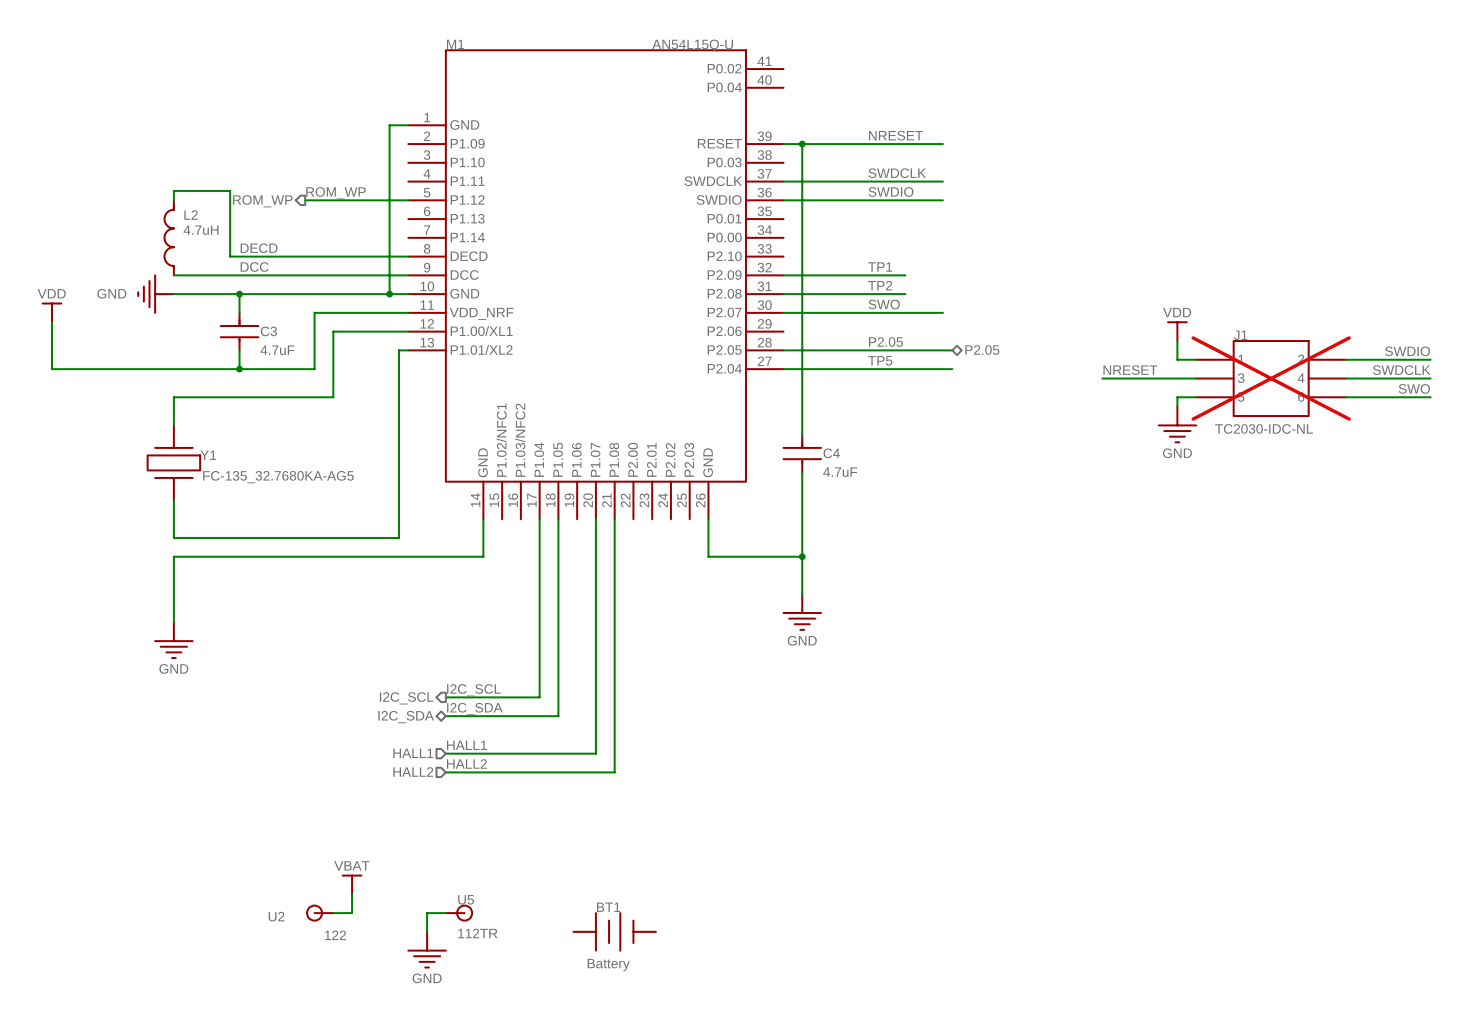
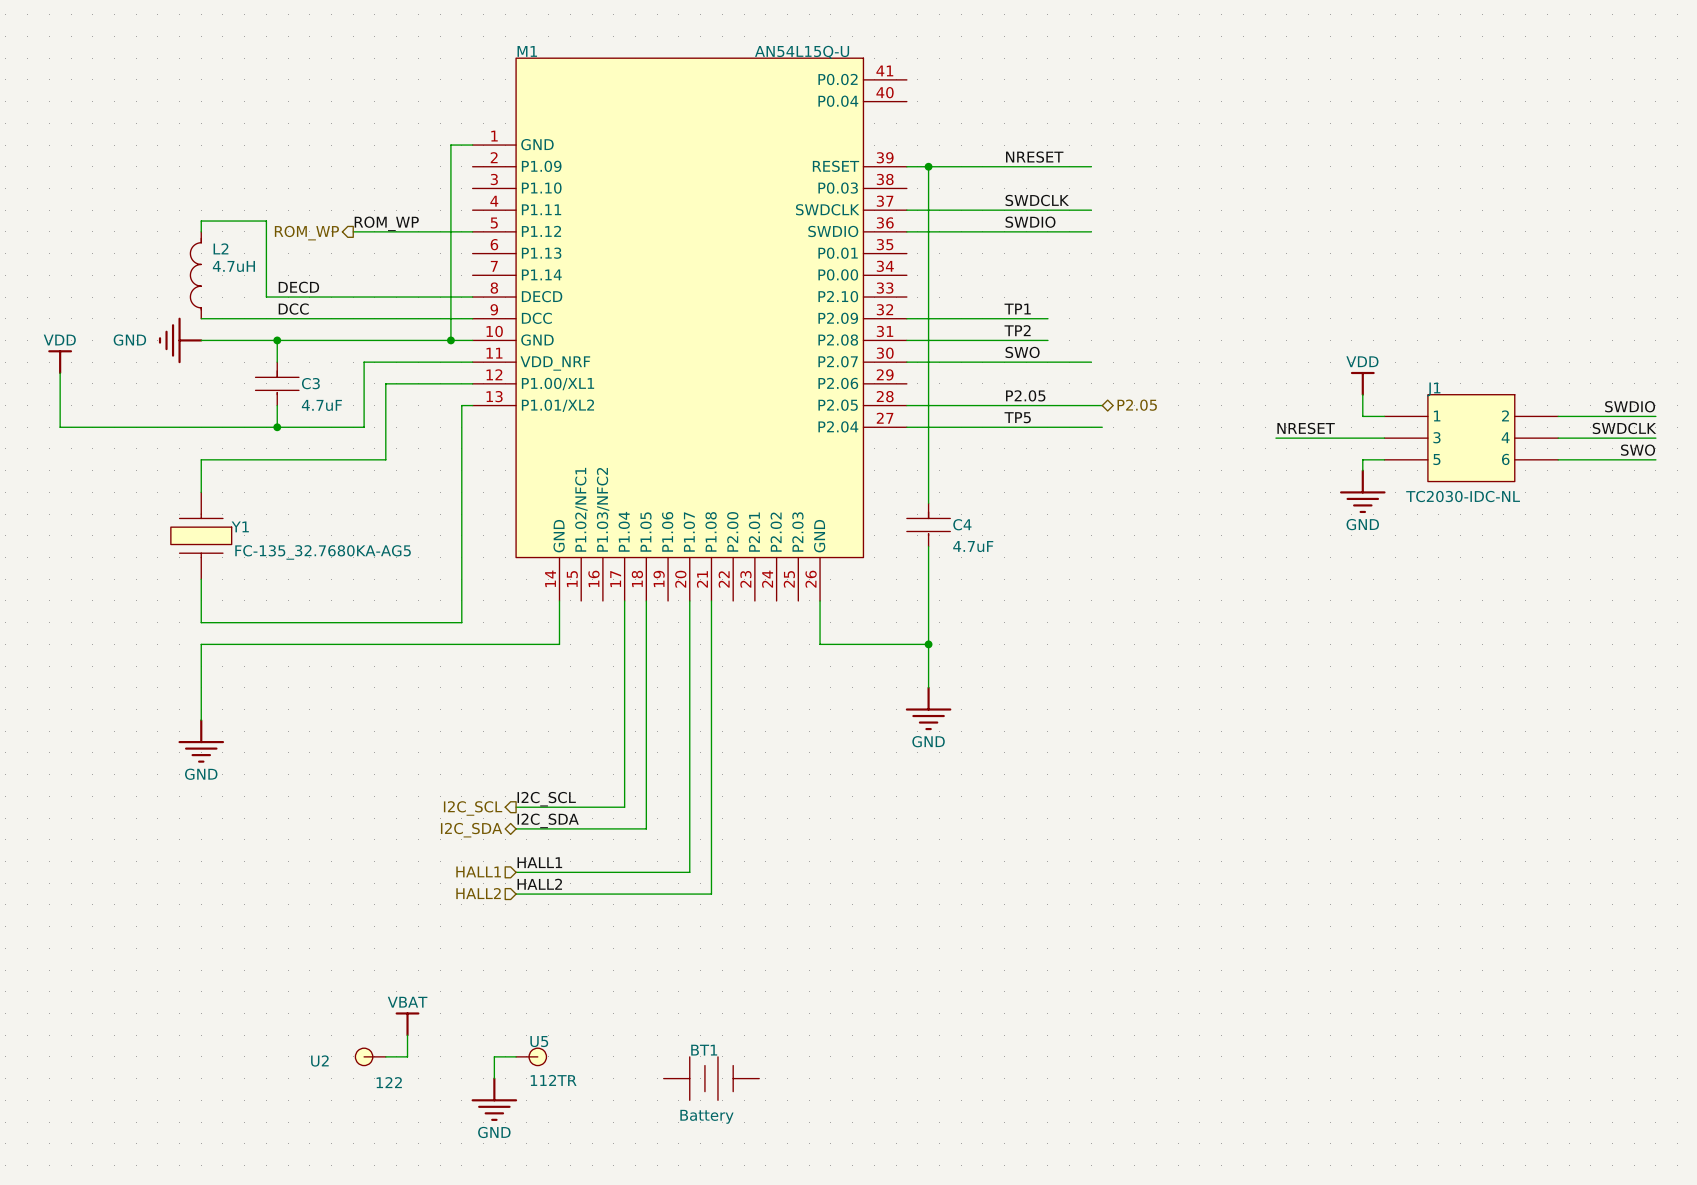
J1 do-not-place cross: (1271, 378) -> none

